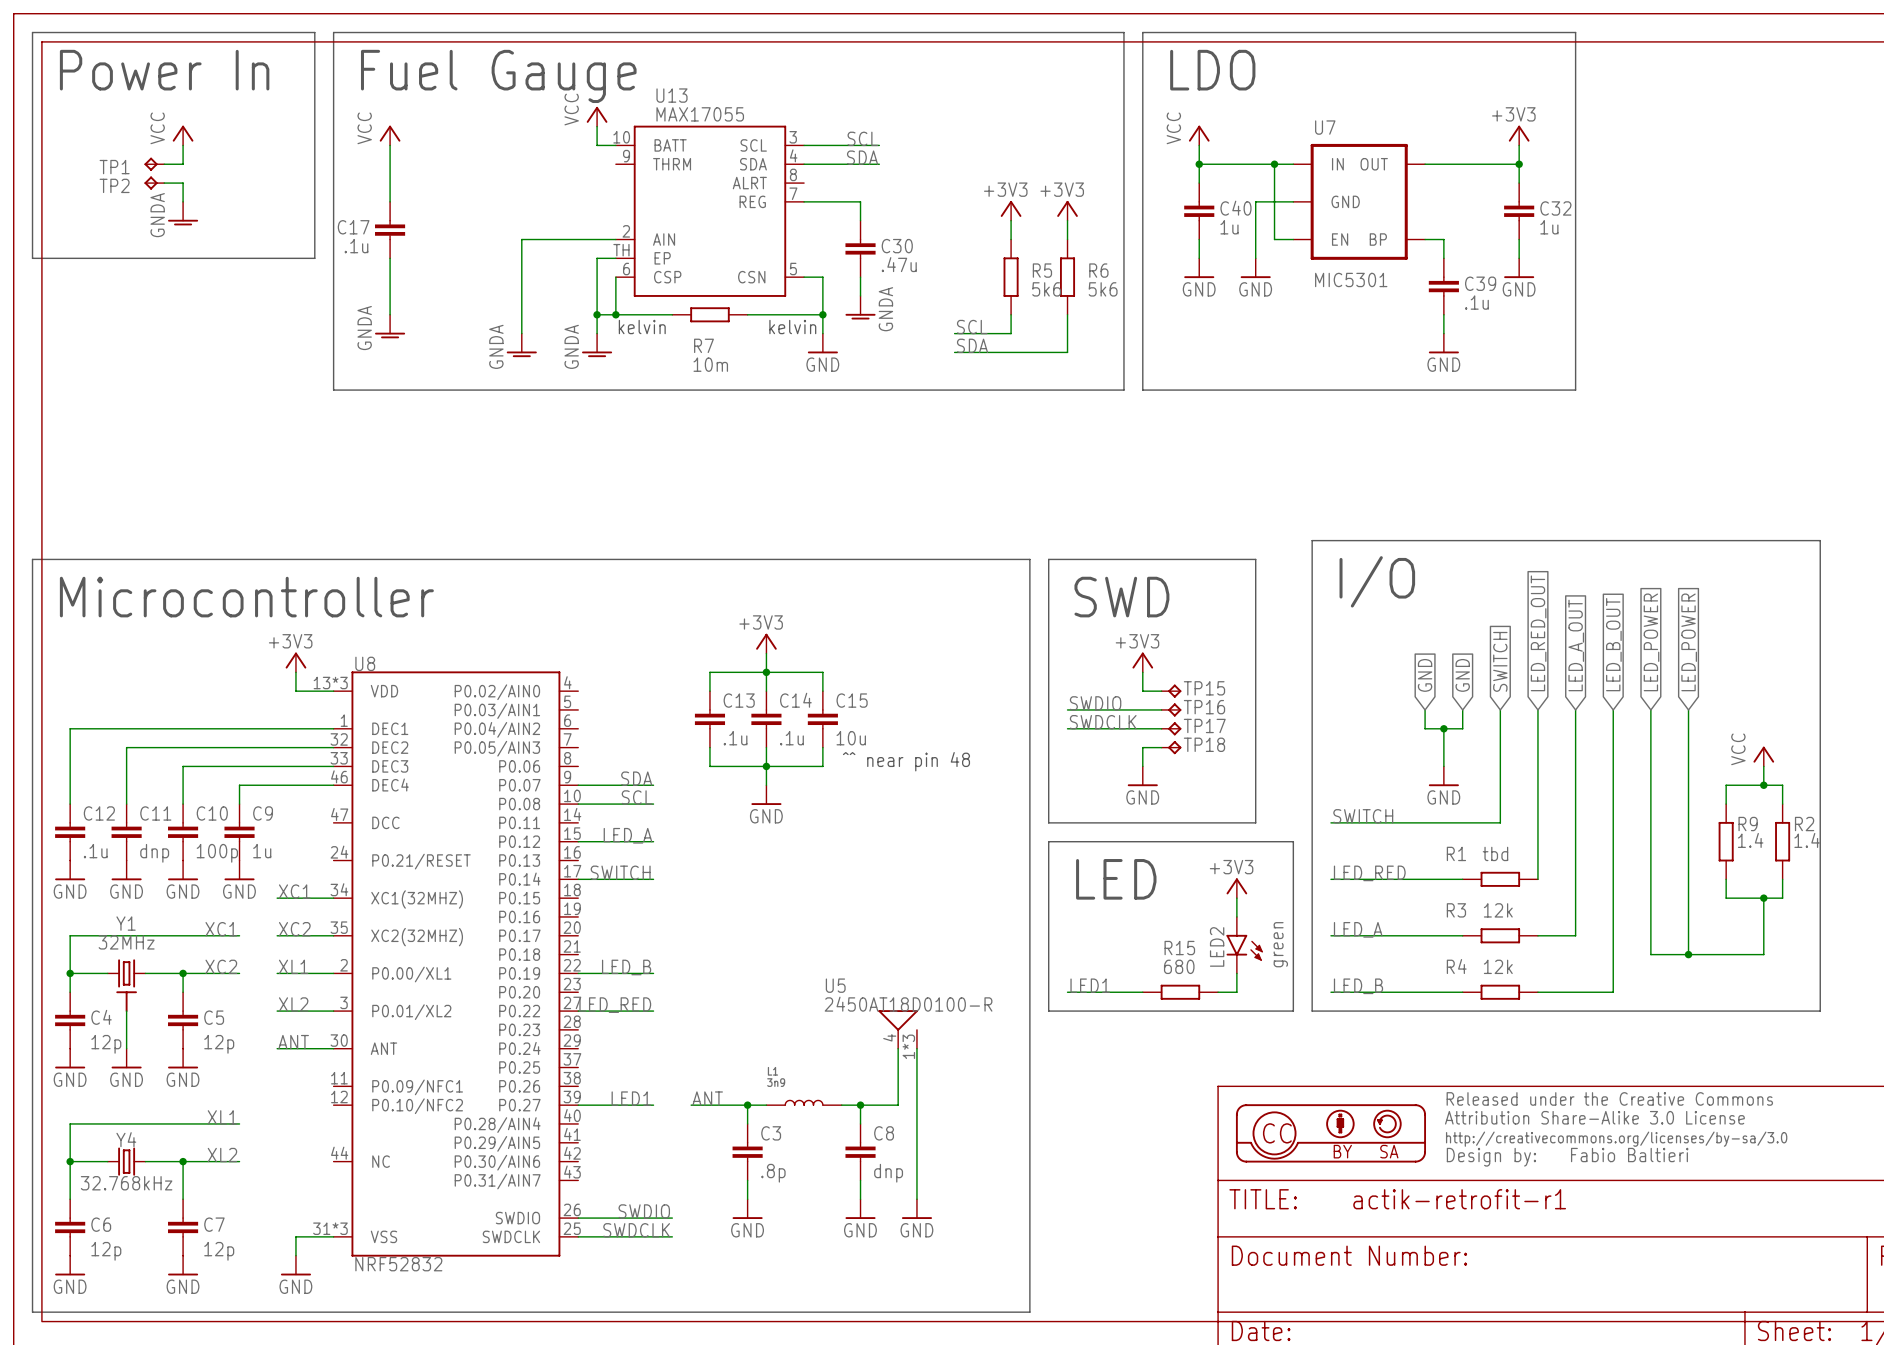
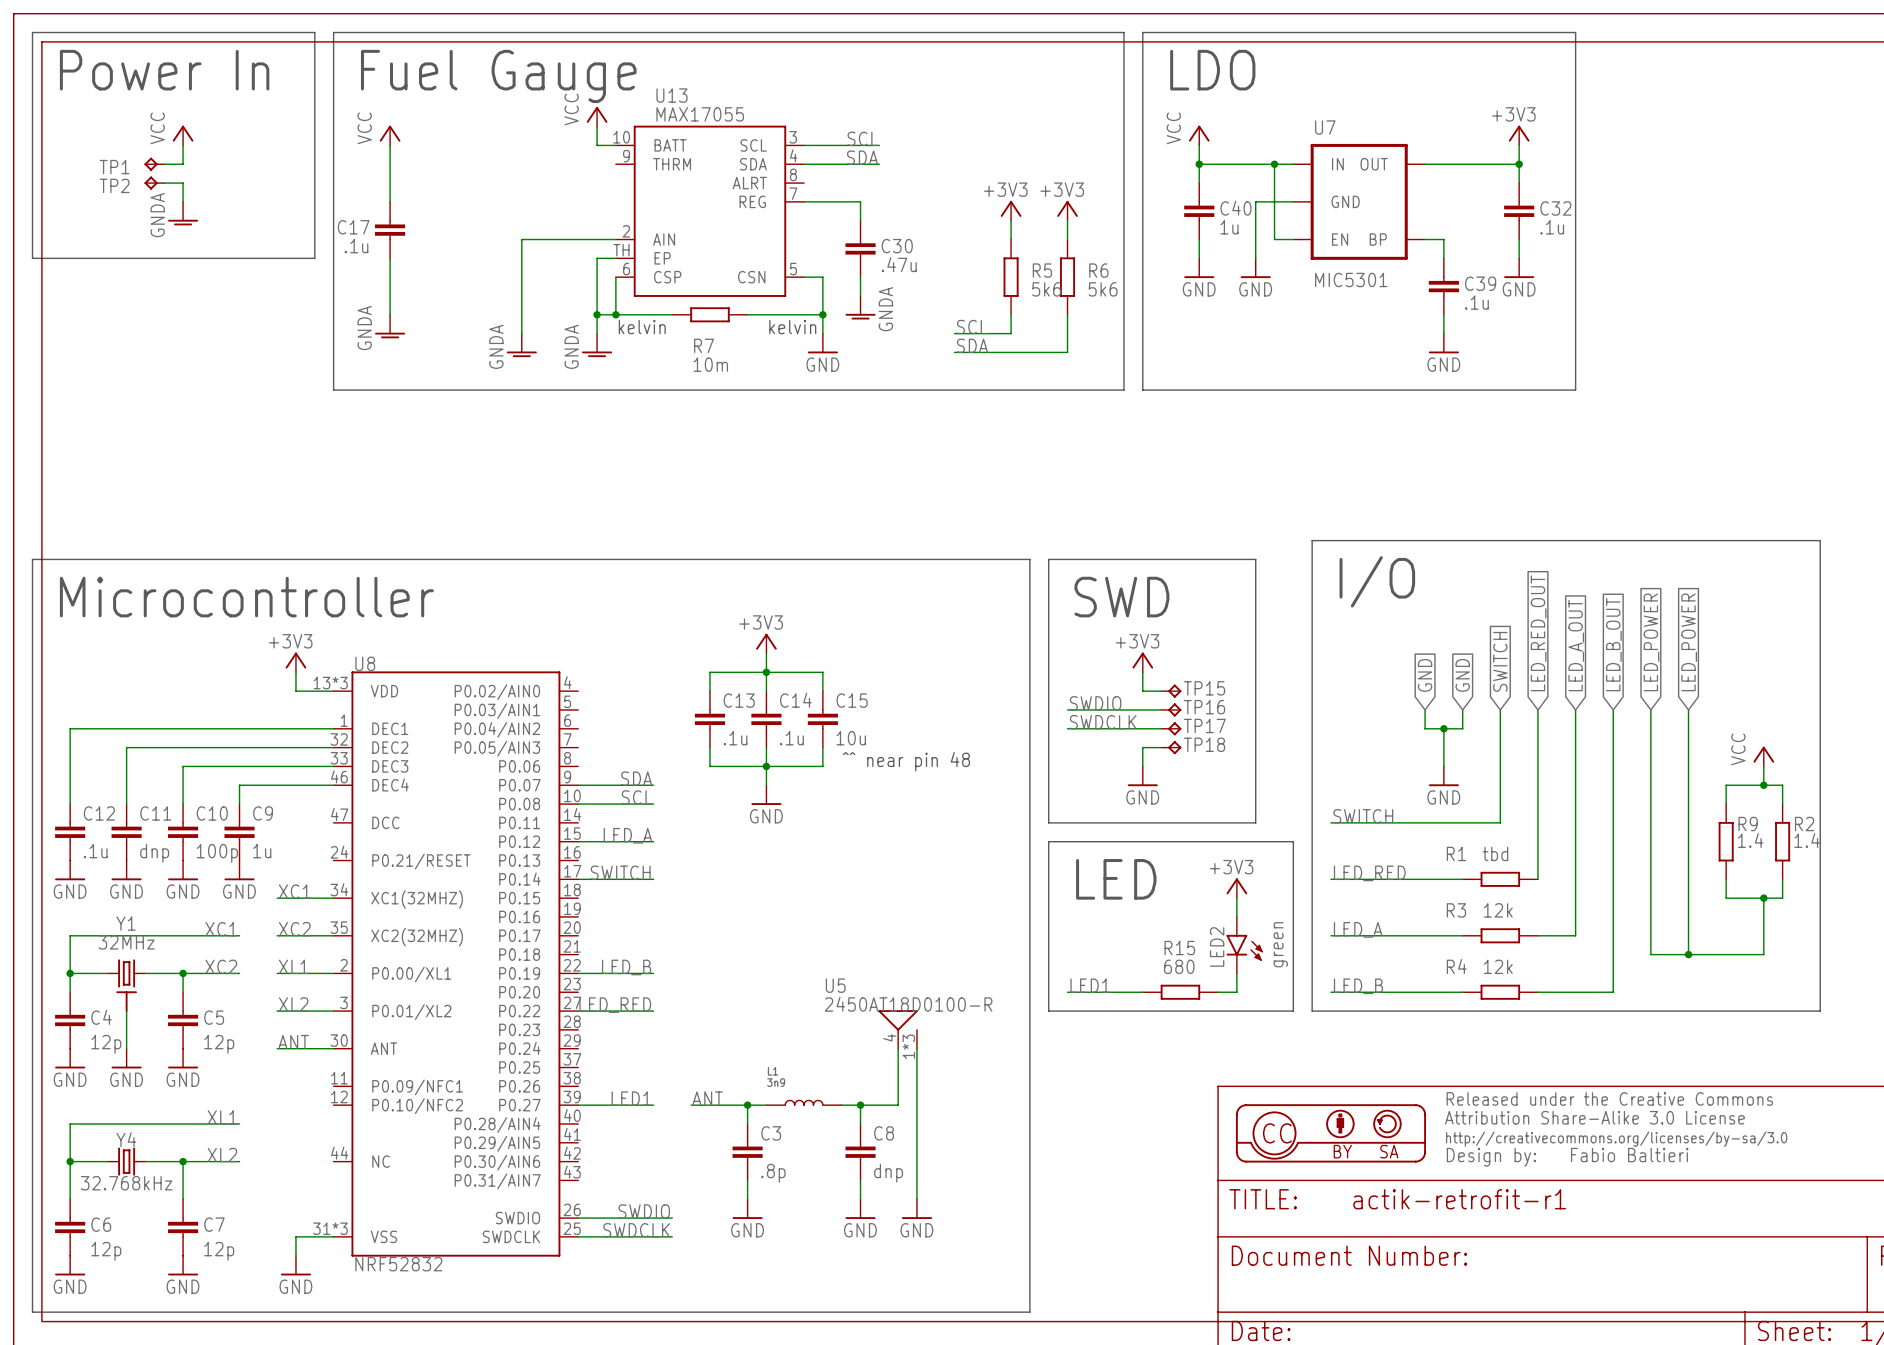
C32 value: 1u (1549, 227) -> .1u (1552, 227)

